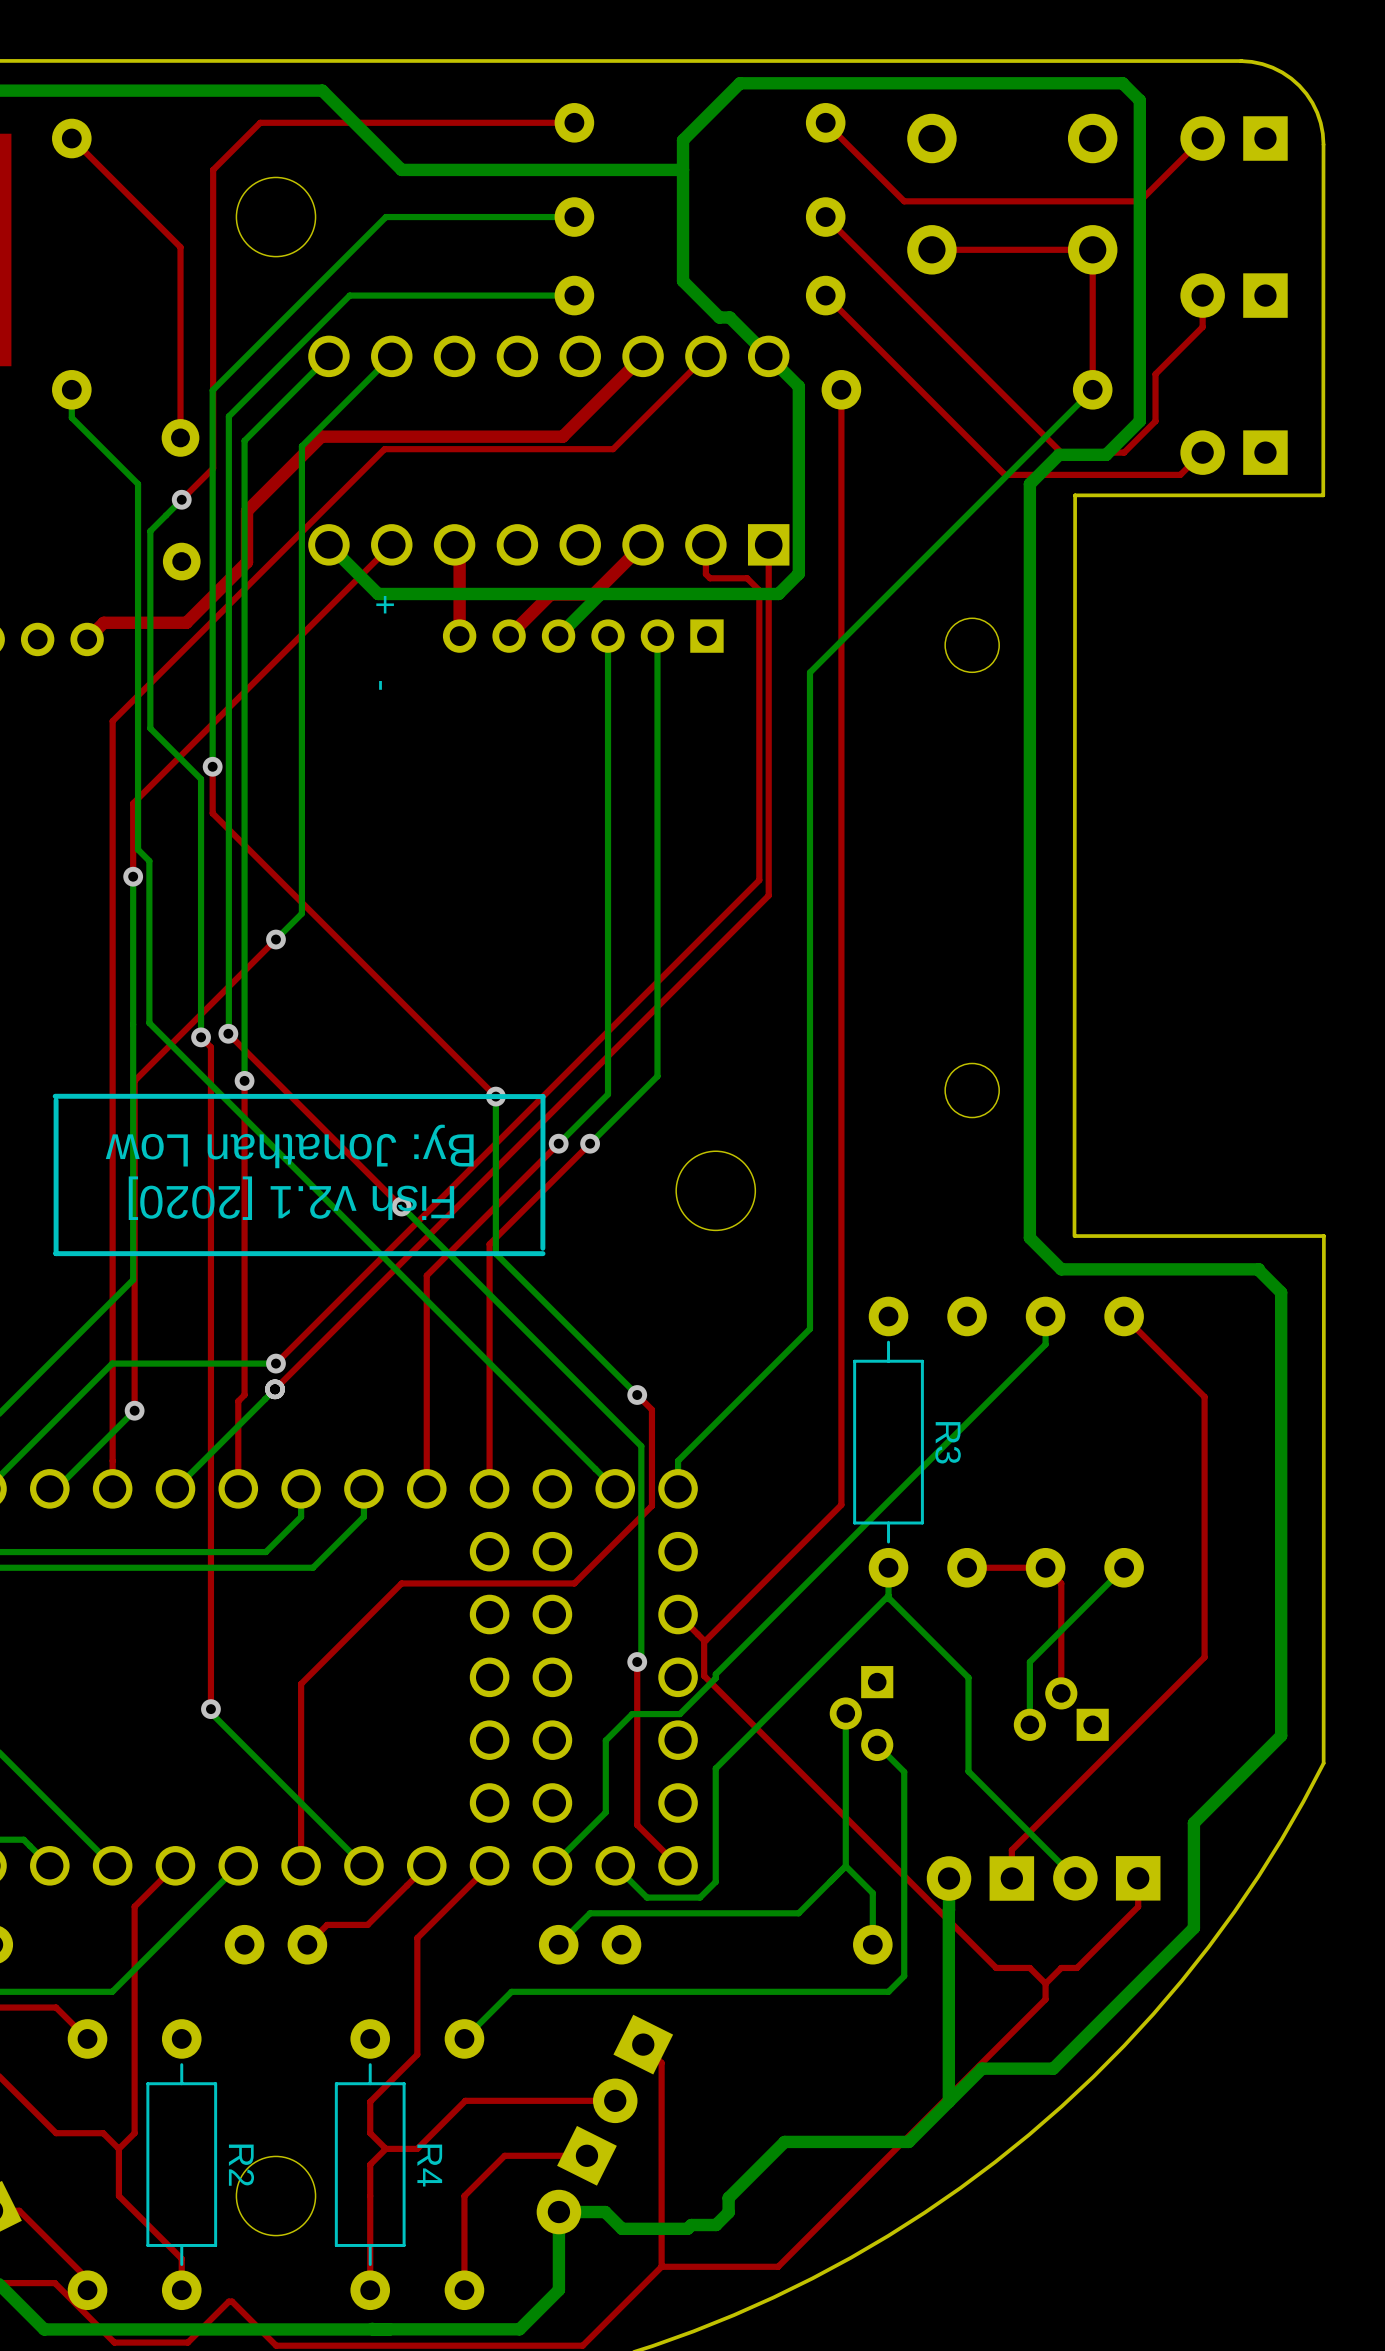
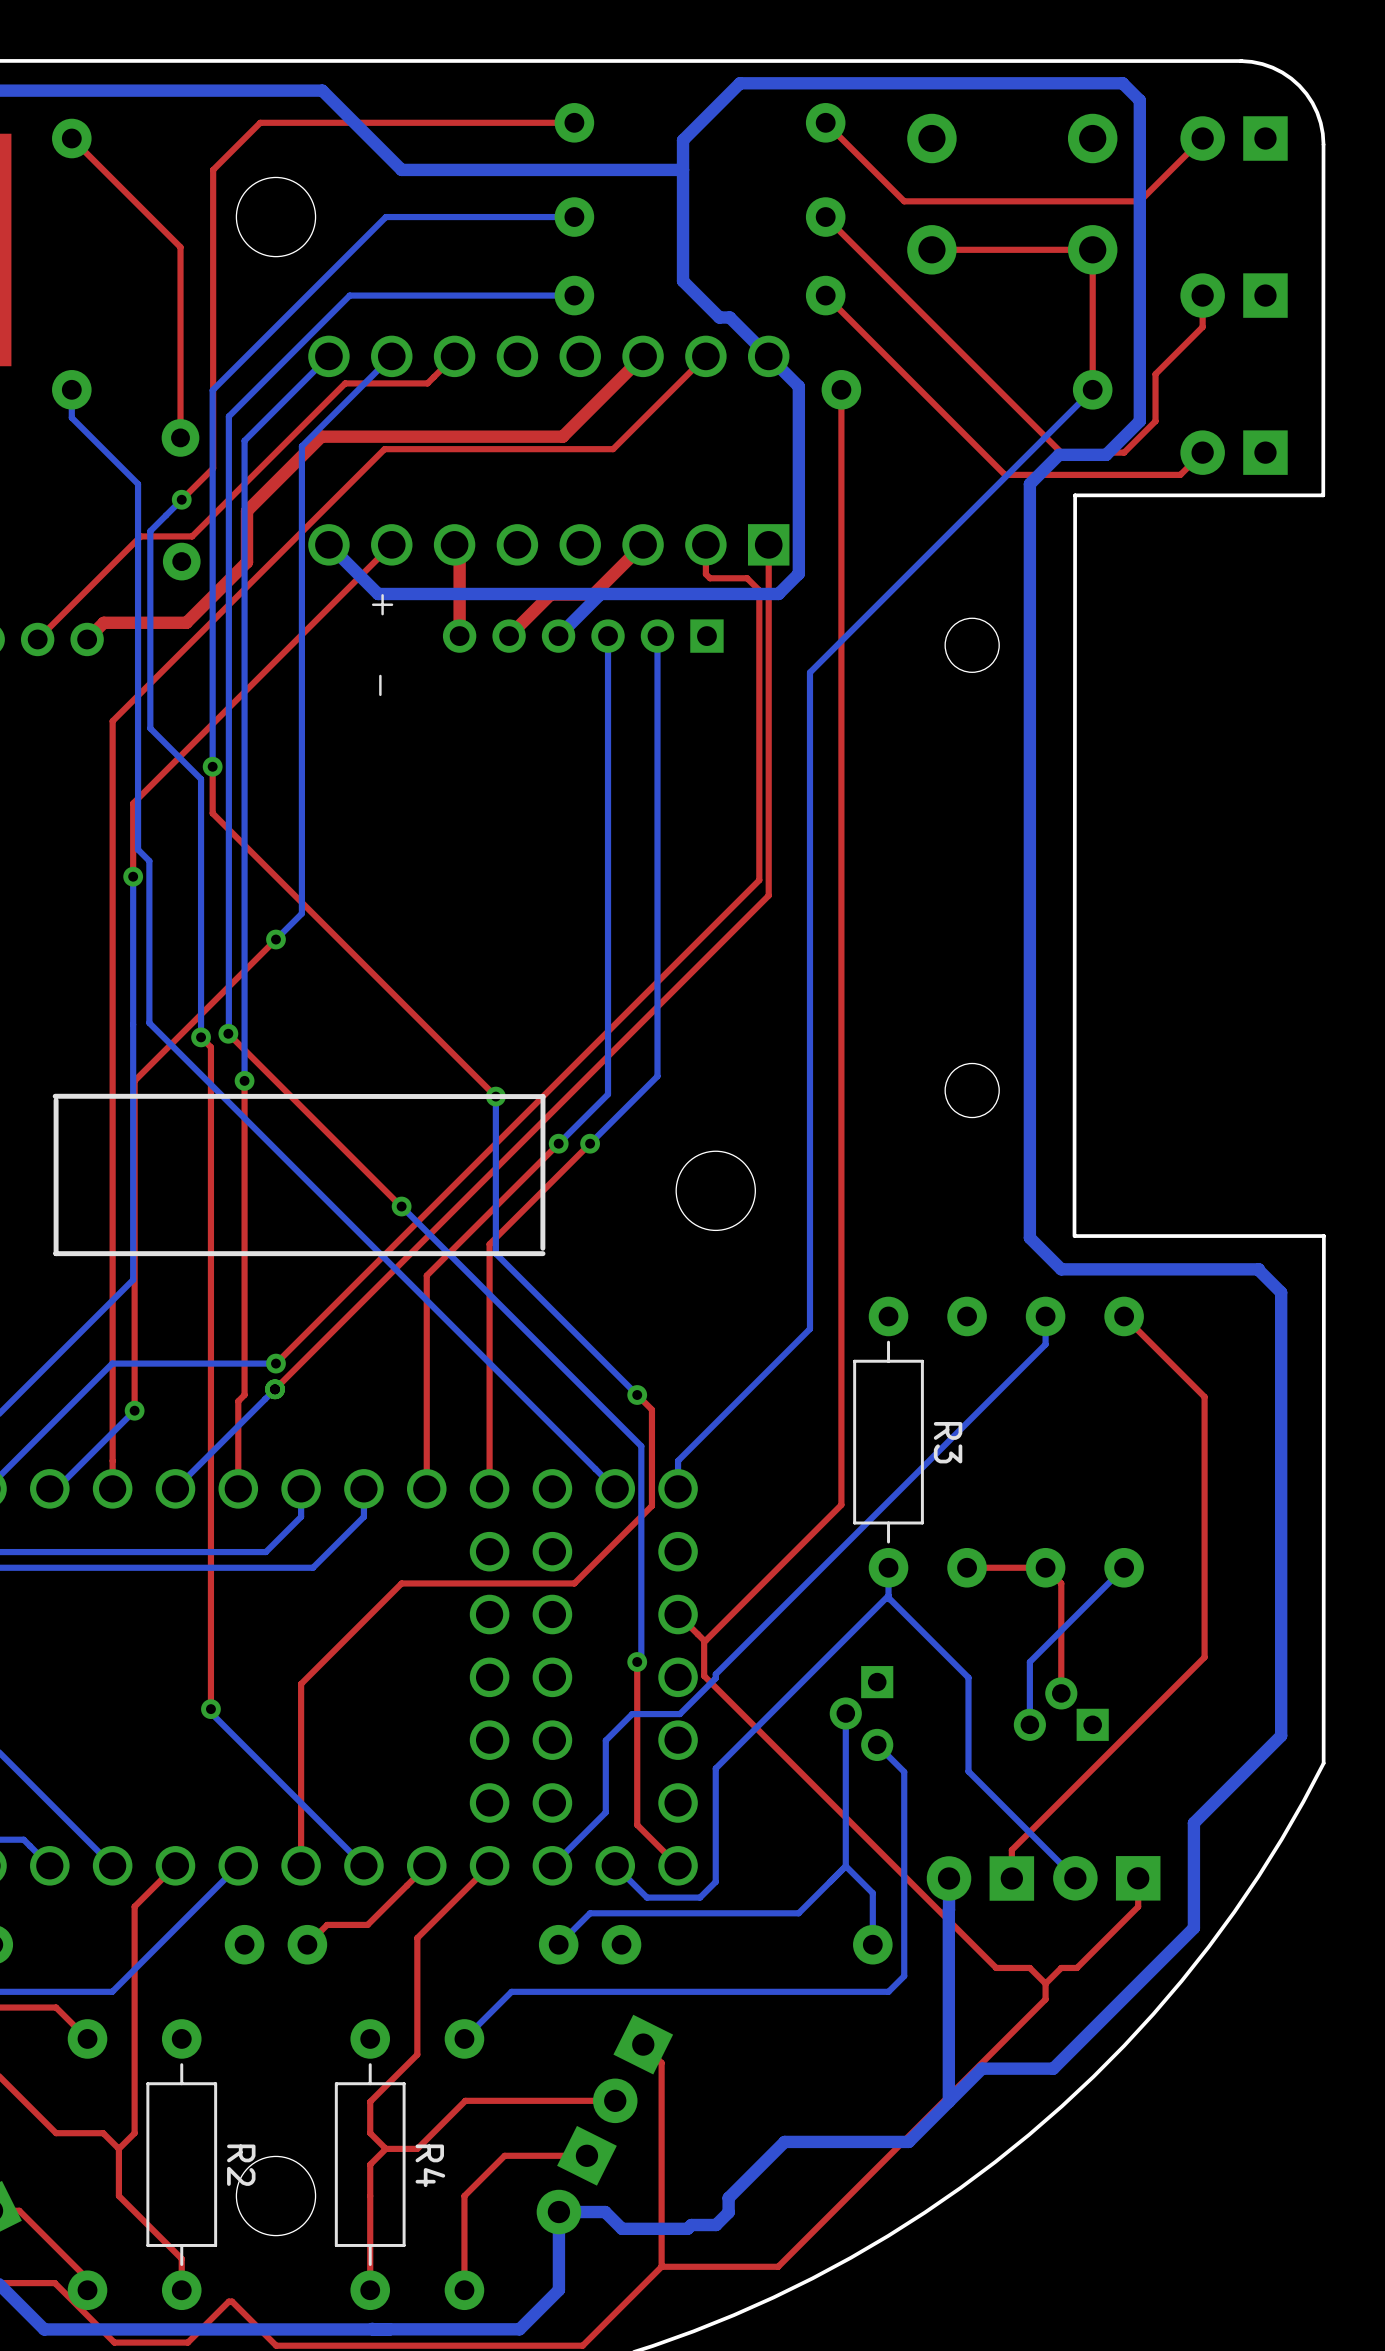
top track: none -> (454, 356) (427, 383) (345, 383) (192, 536) (140, 536) (37, 639)
text: By: Jonathan Low (289, 1146) -> none
text: Fish v2.1 [2020] (291, 1198) -> none

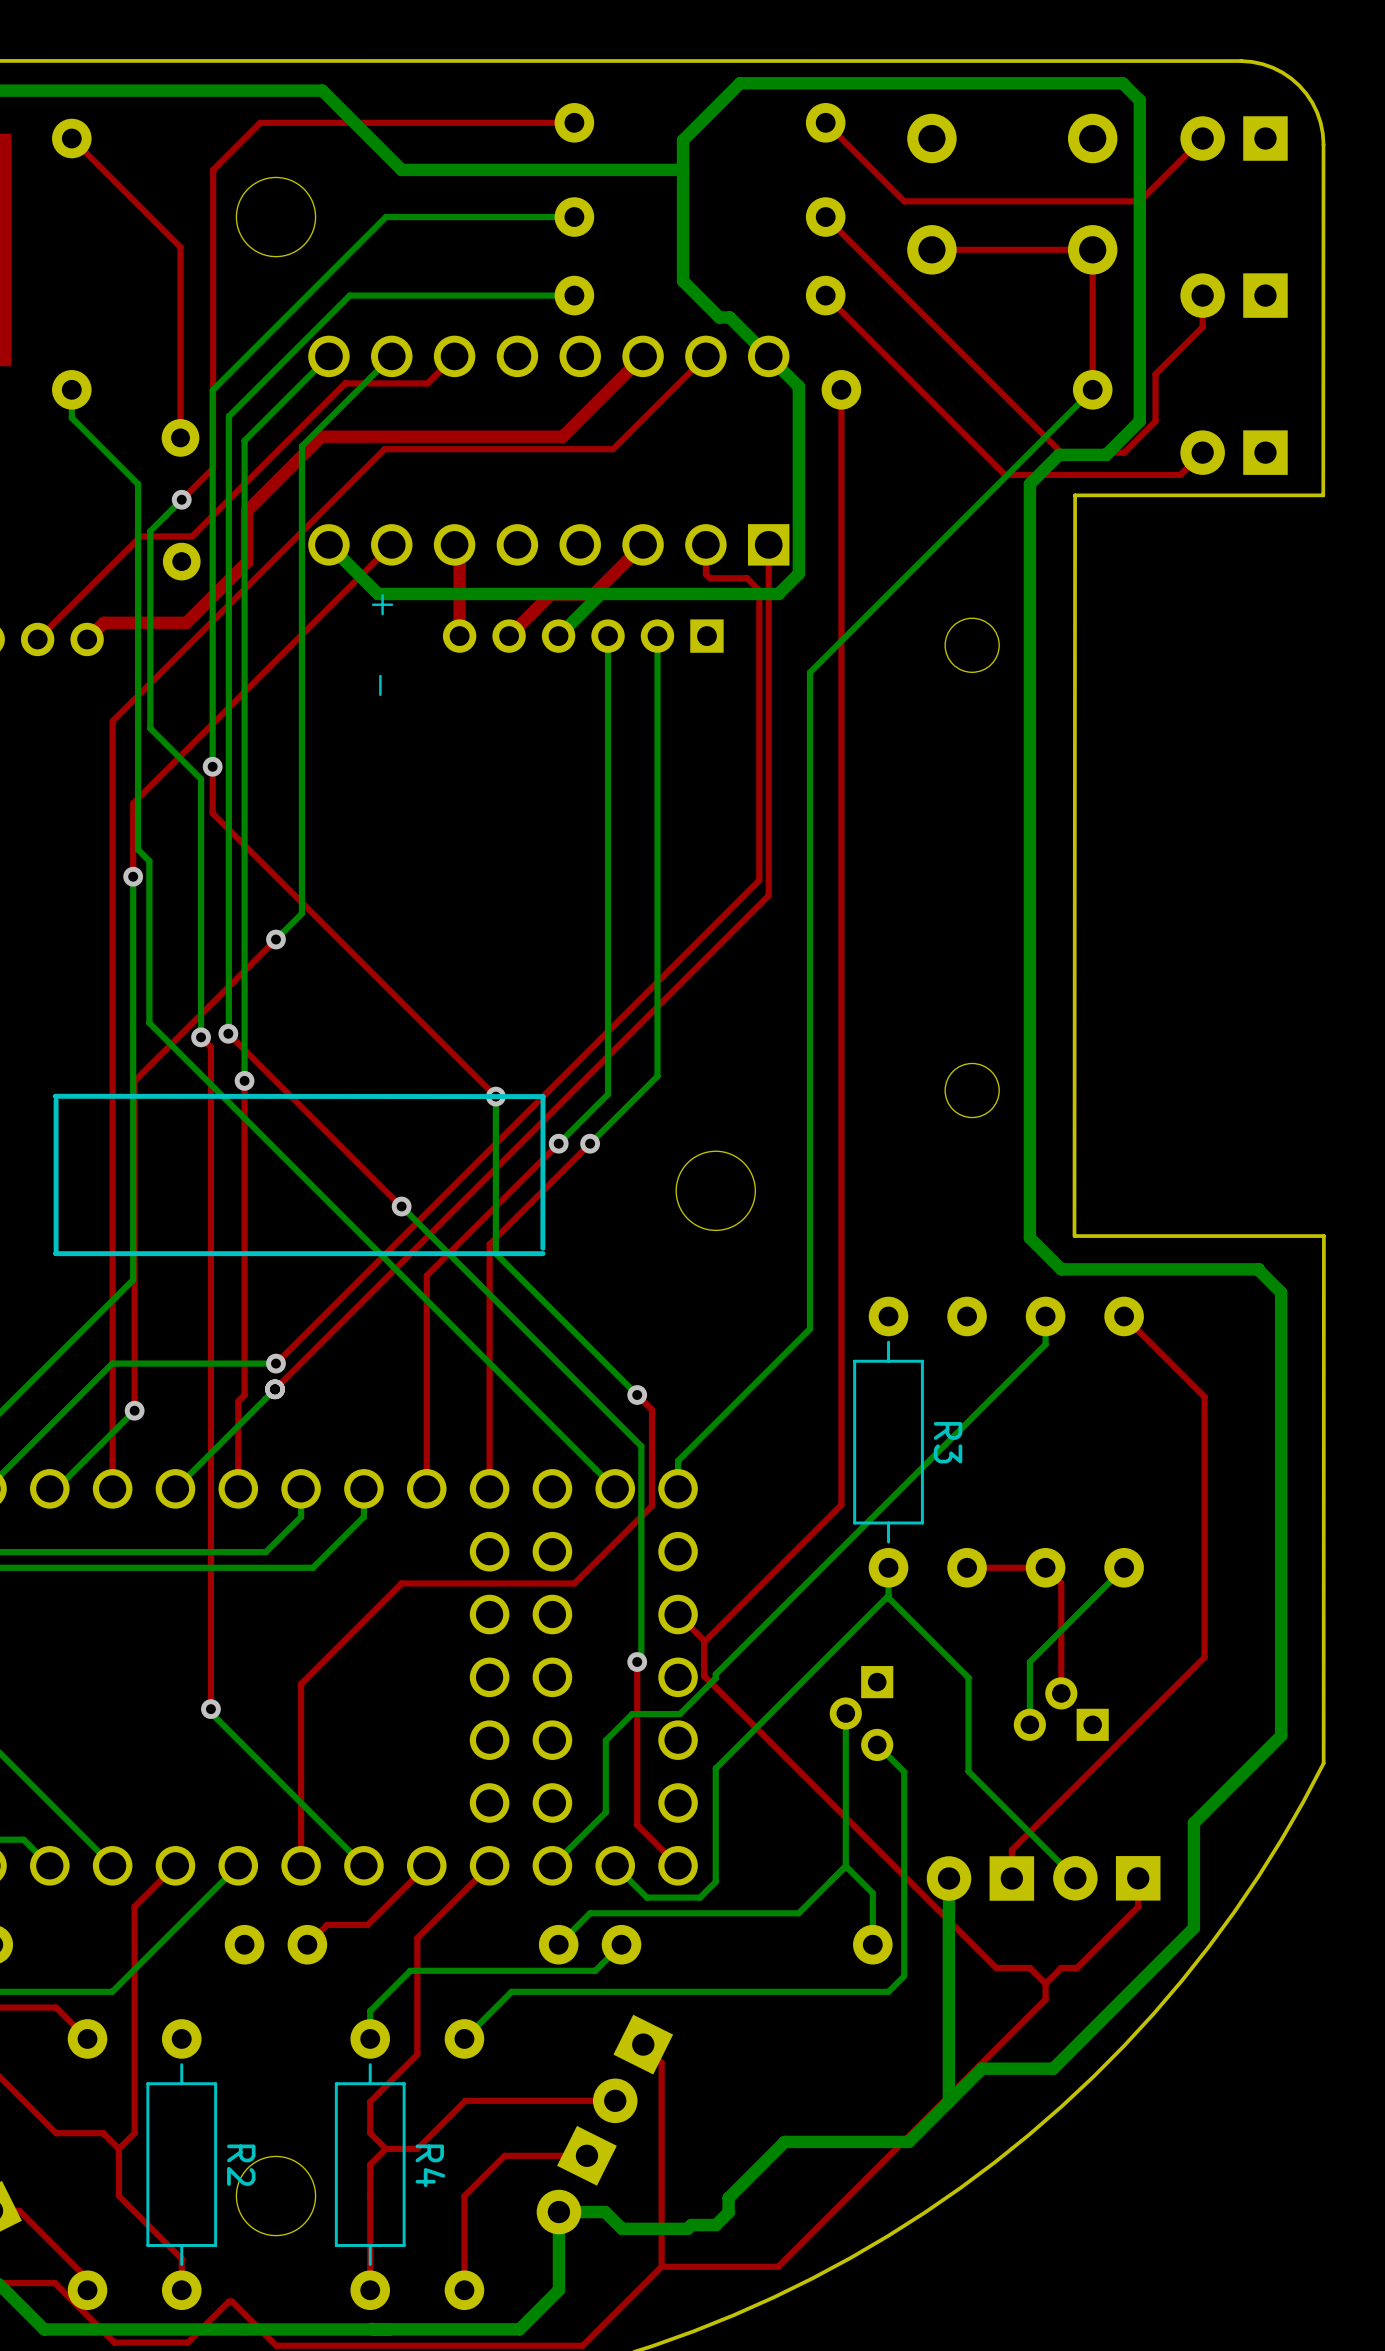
bottom track: none -> (621, 1944) (595, 1970) (410, 1970) (370, 2010) (370, 2038)

